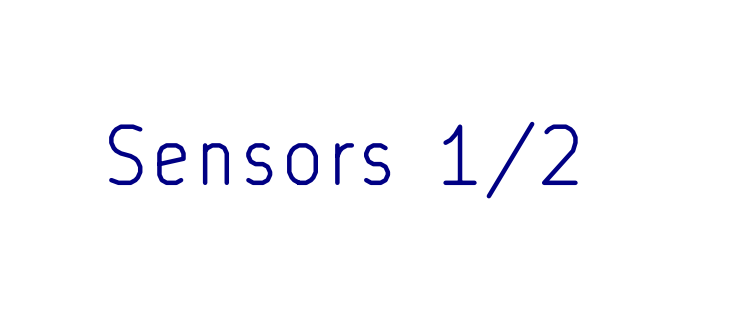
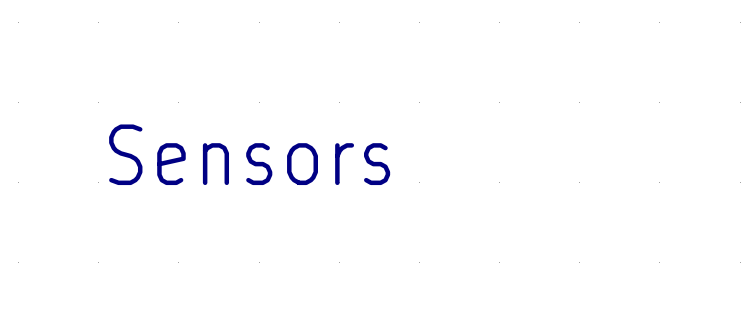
text: Sensors 1/2 (343, 160) -> Sensors (249, 154)

